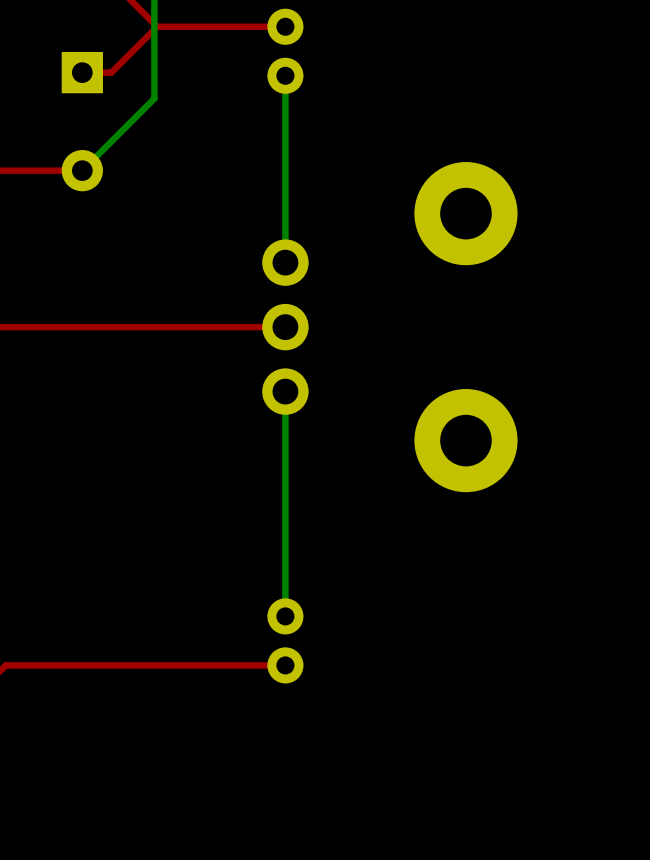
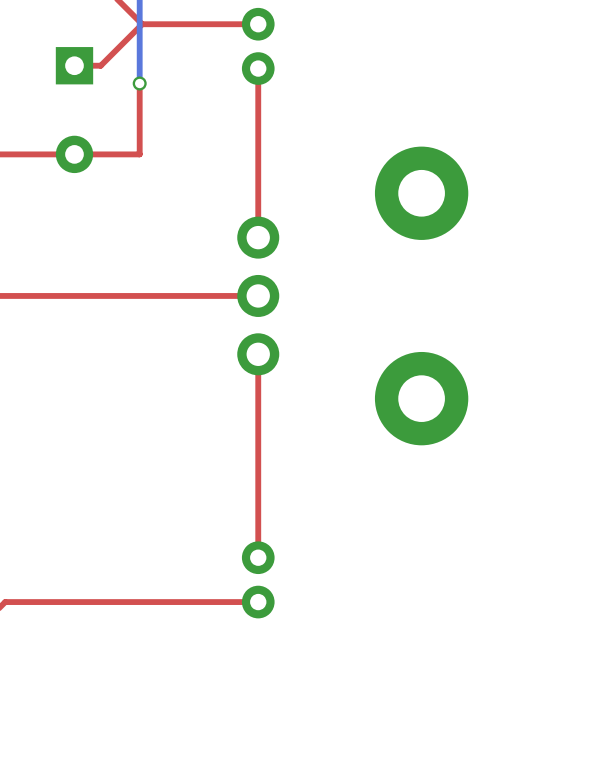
top track: none -> (258, 68) (258, 237)
bottom track: (285, 75) (285, 262) -> none
top track: none -> (139, 83) (139, 154)
bottom track: (154, 92) (154, 98) (82, 170) -> none
via: none -> (139, 83)
top track: none -> (139, 154) (74, 154)
top track: none -> (258, 354) (258, 557)
bottom track: (285, 391) (285, 616) -> none

